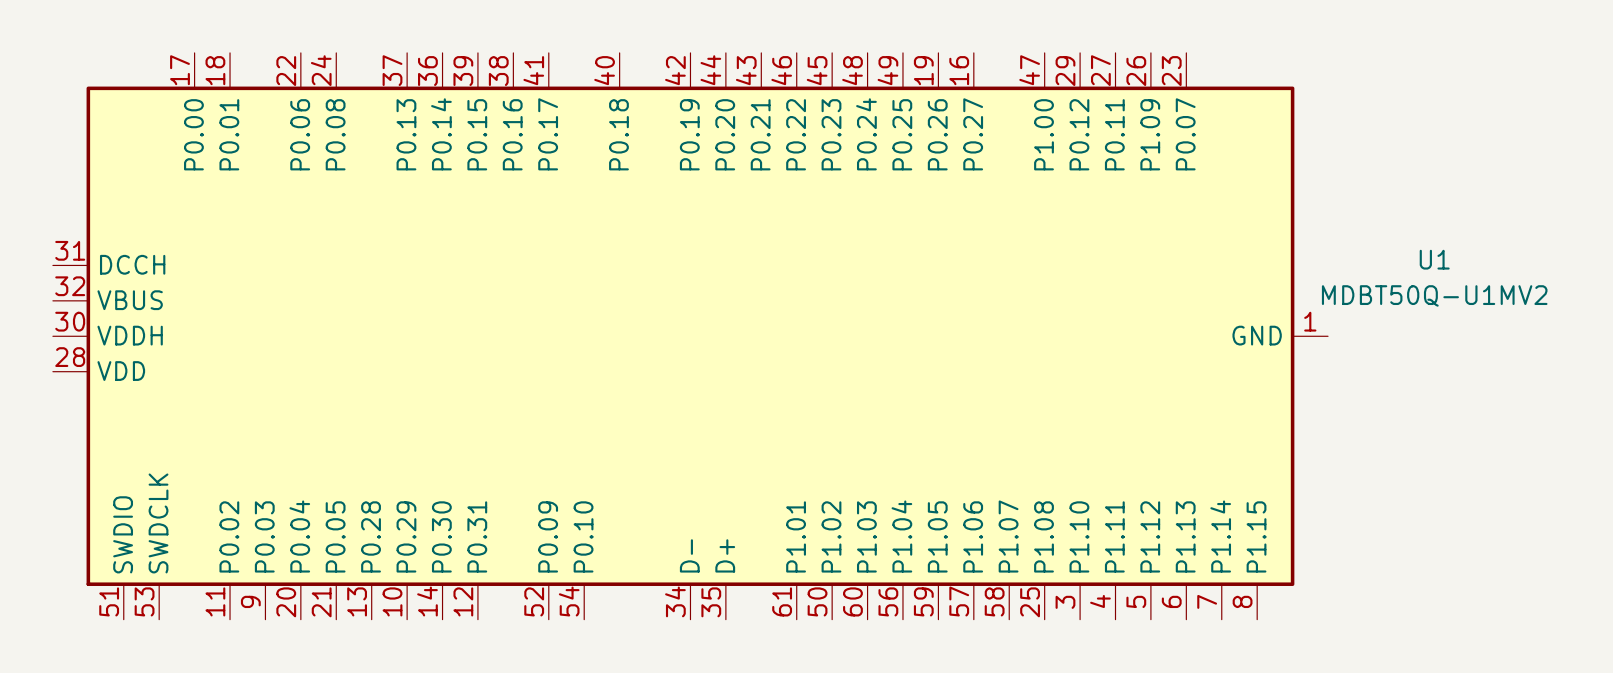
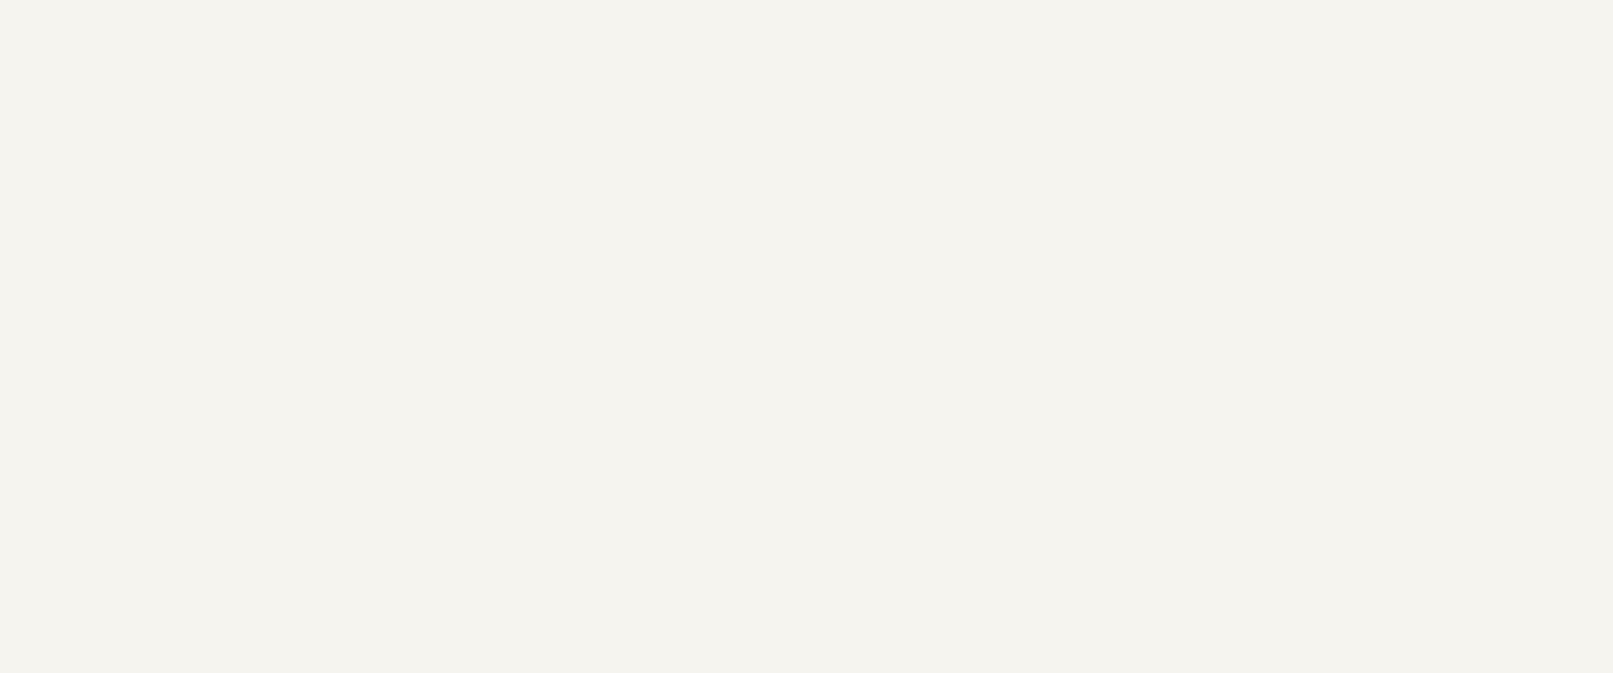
U1: MDBT50Q-U1MV2 (690, 336) -> none

